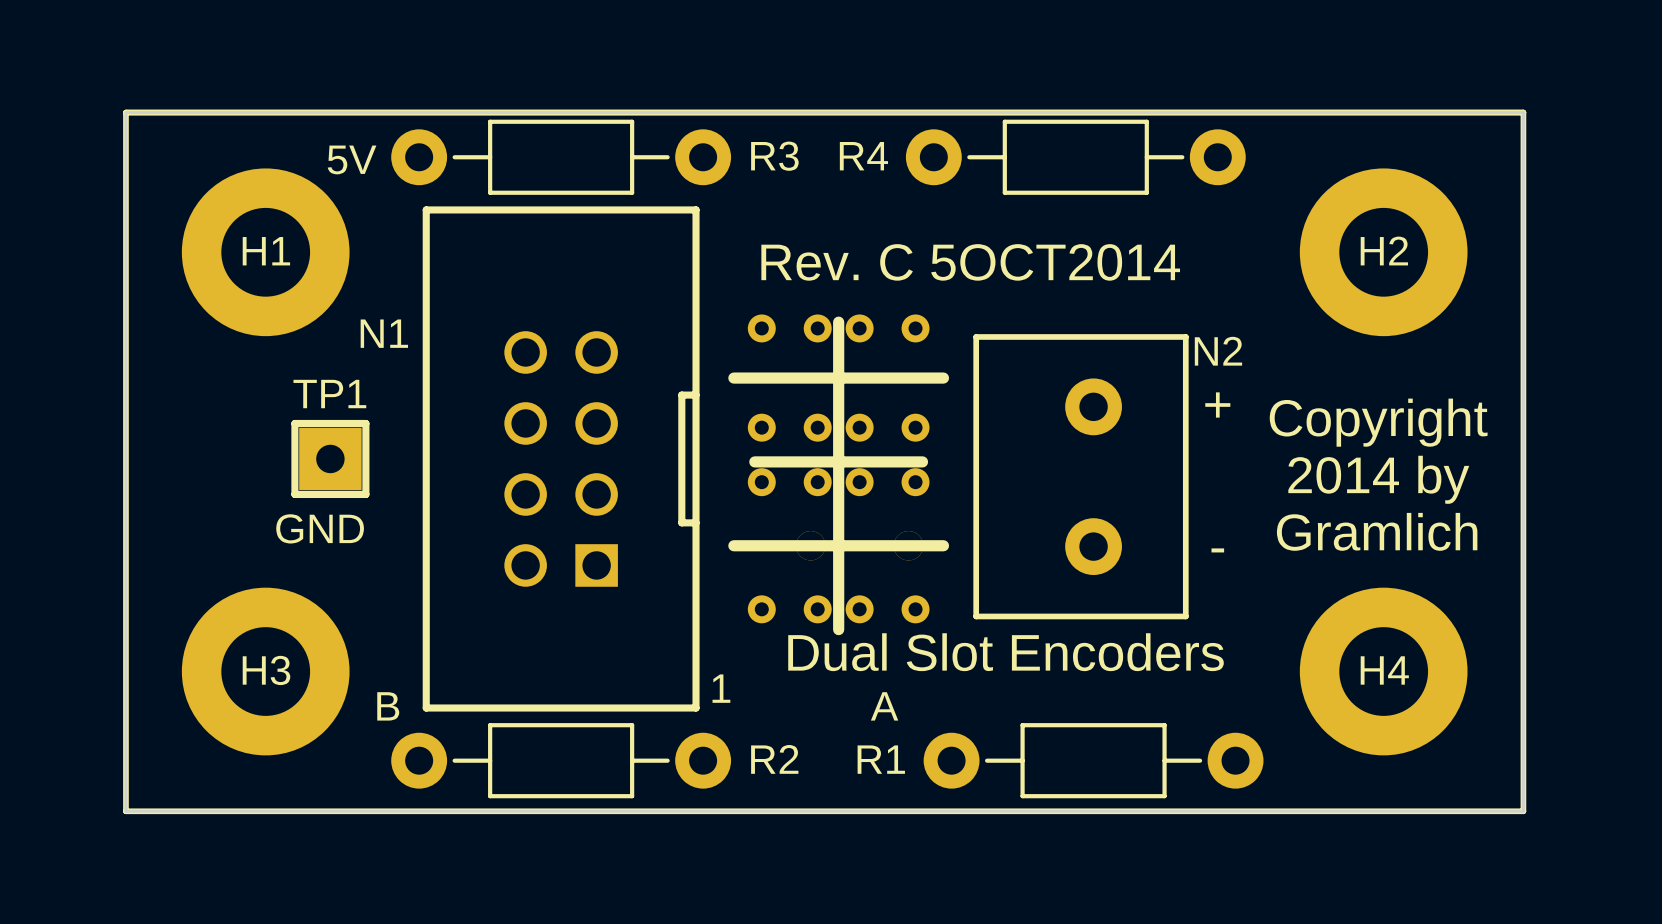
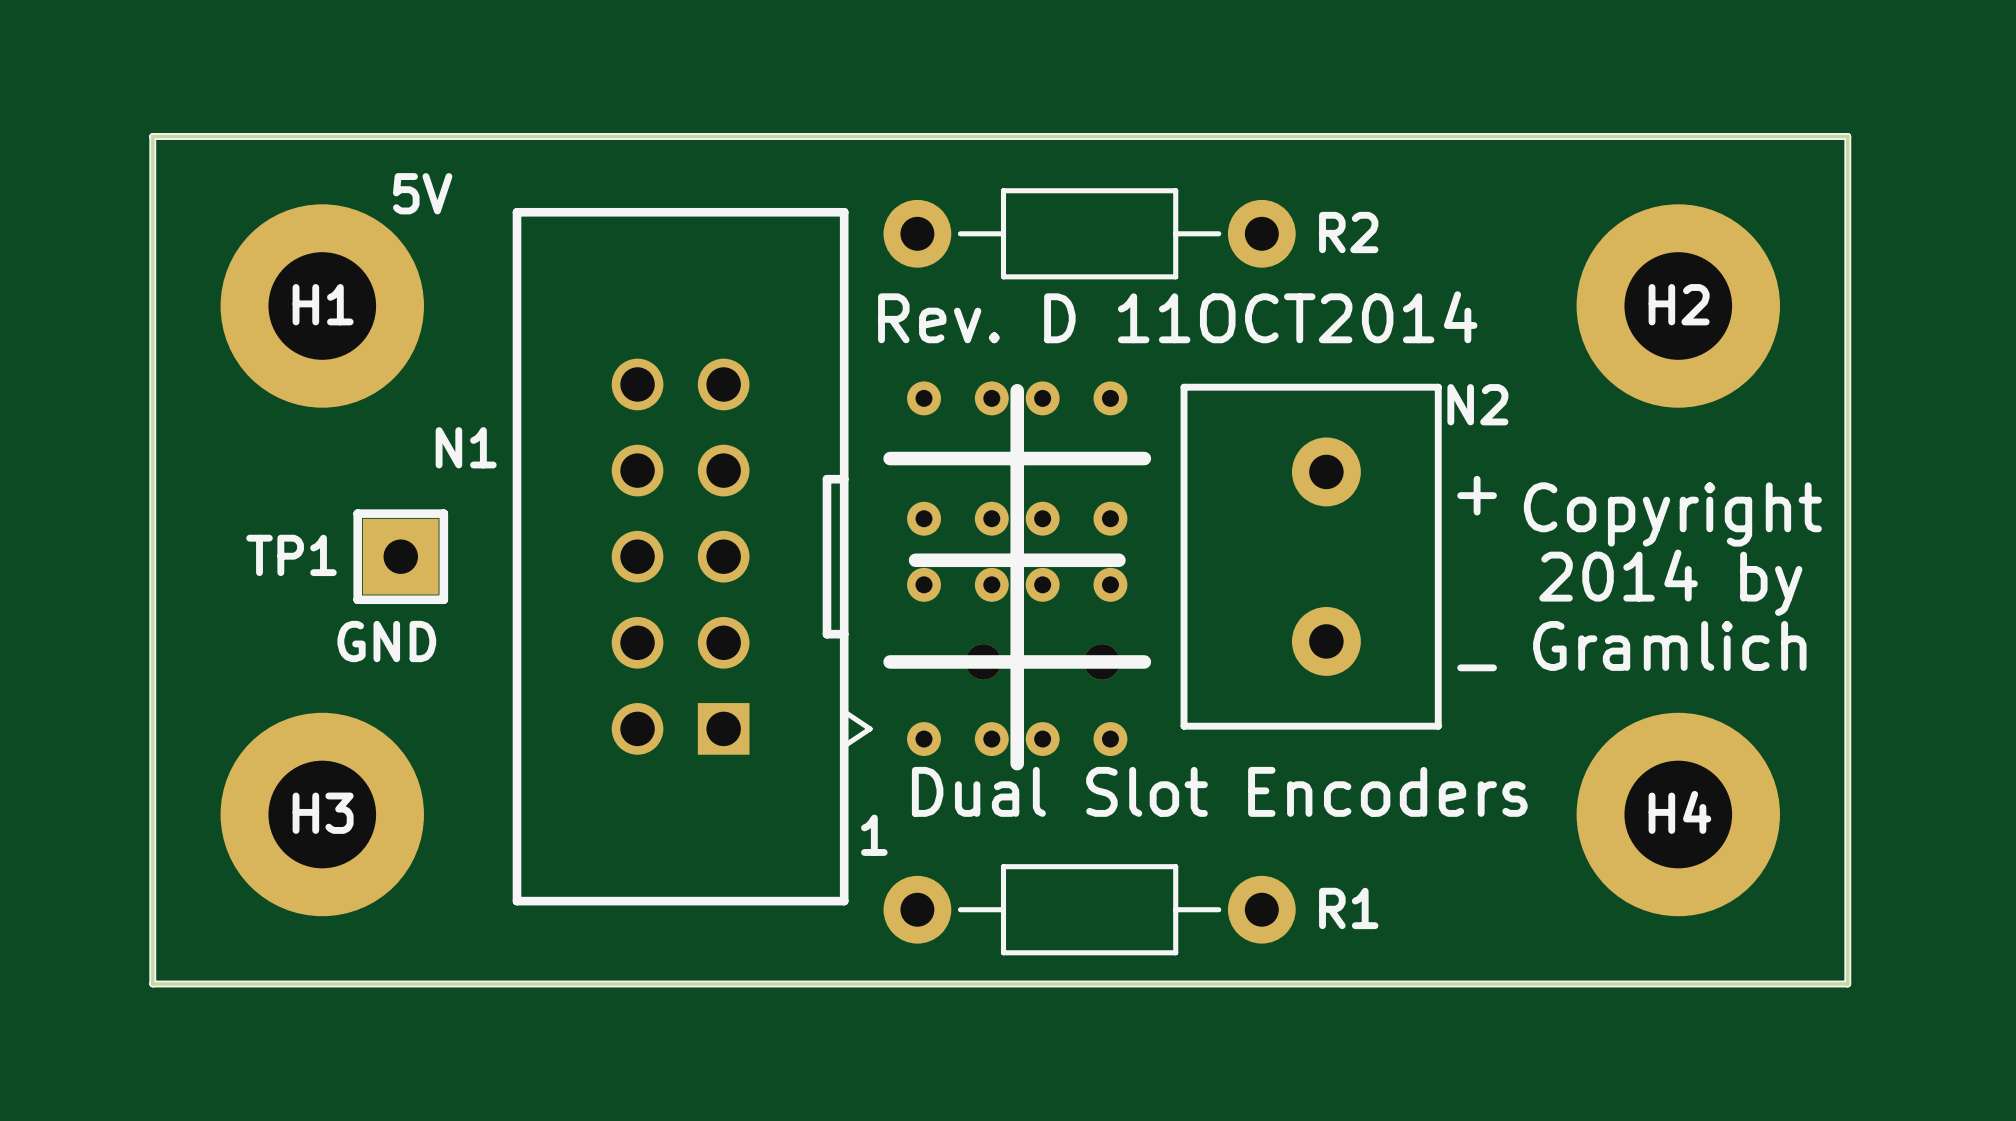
R3: (561, 157) -> none
R4: (1075, 157) -> none
N1 footprint: [422, 206, 700, 712] -> [512, 207, 873, 906]
text: Rev. C 5OCT2014 (970, 262) -> Rev. D 11OCT2014 (1177, 317)
TP1 name position: TP1 (329, 394) -> TP1 (291, 555)
N2 position: (1080, 476) -> (1311, 556)
text: B (388, 706) -> none
text: A (884, 706) -> none
R1 name position: R1 (881, 759) -> R1 (1348, 908)
R2 position: (561, 760) -> (1089, 233)
R1 position: (1093, 760) -> (1089, 909)

